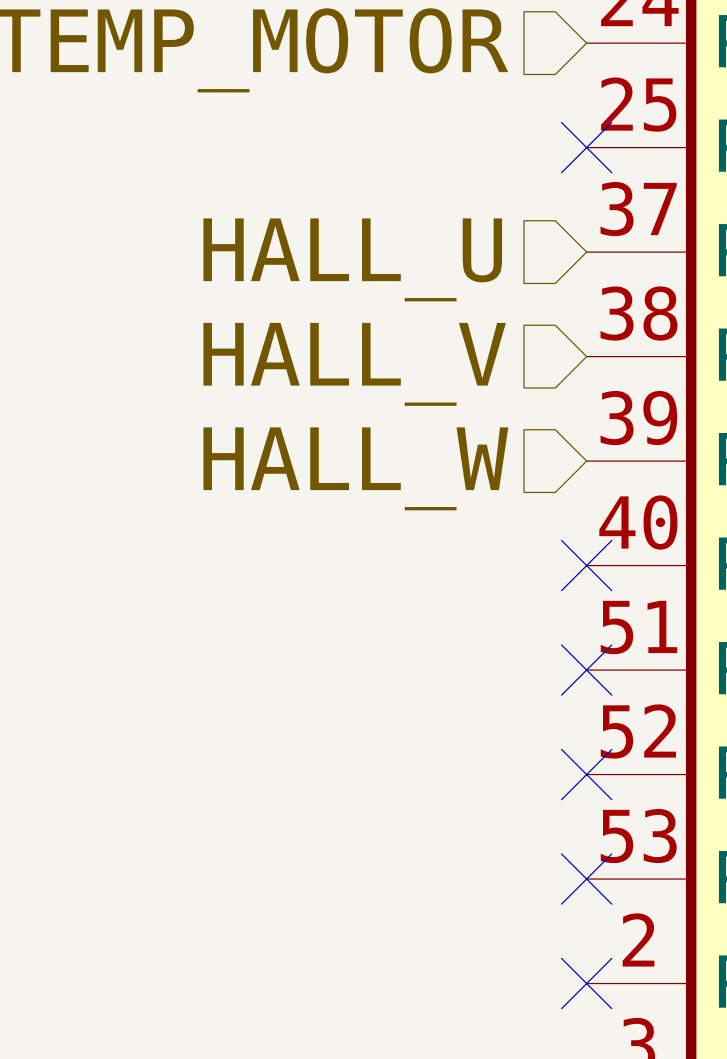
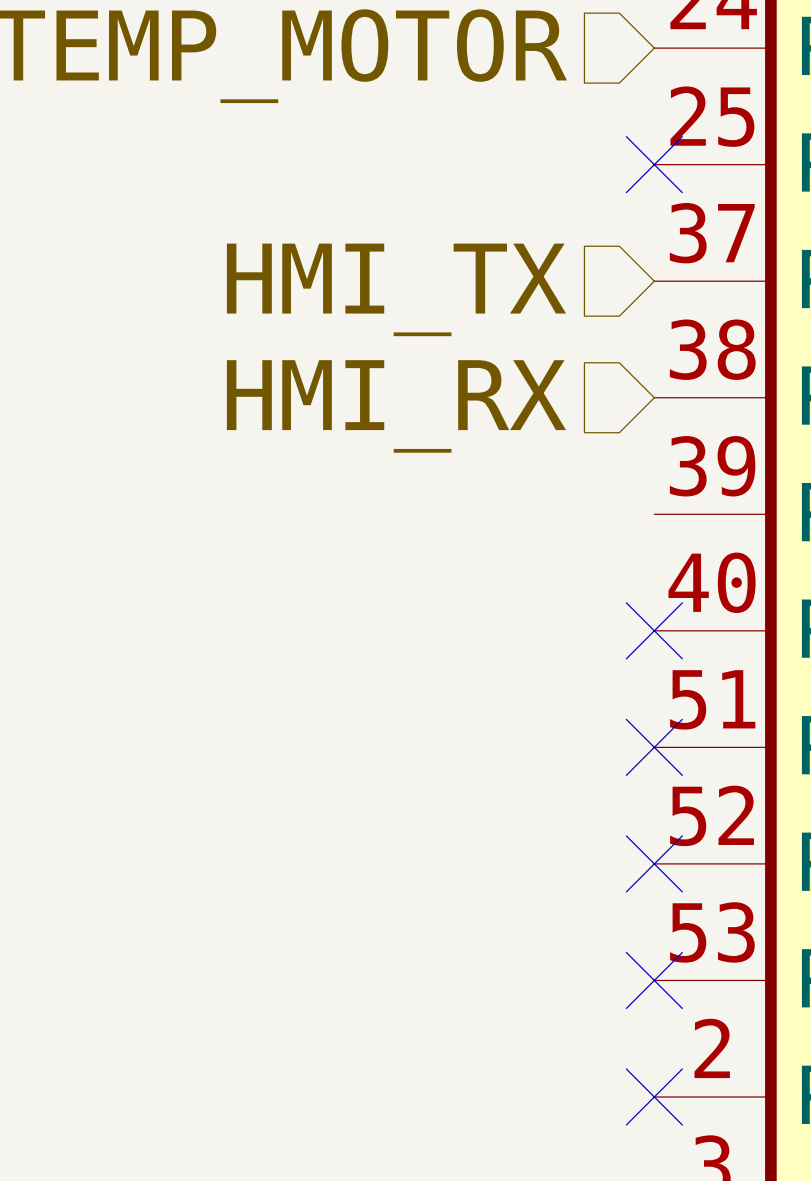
hierarchical label: HALL_U (352, 259) -> HMI_TX (396, 289)
hierarchical label: HALL_V (354, 364) -> HMI_RX (396, 406)
hierarchical label: HALL_W (355, 468) -> none

